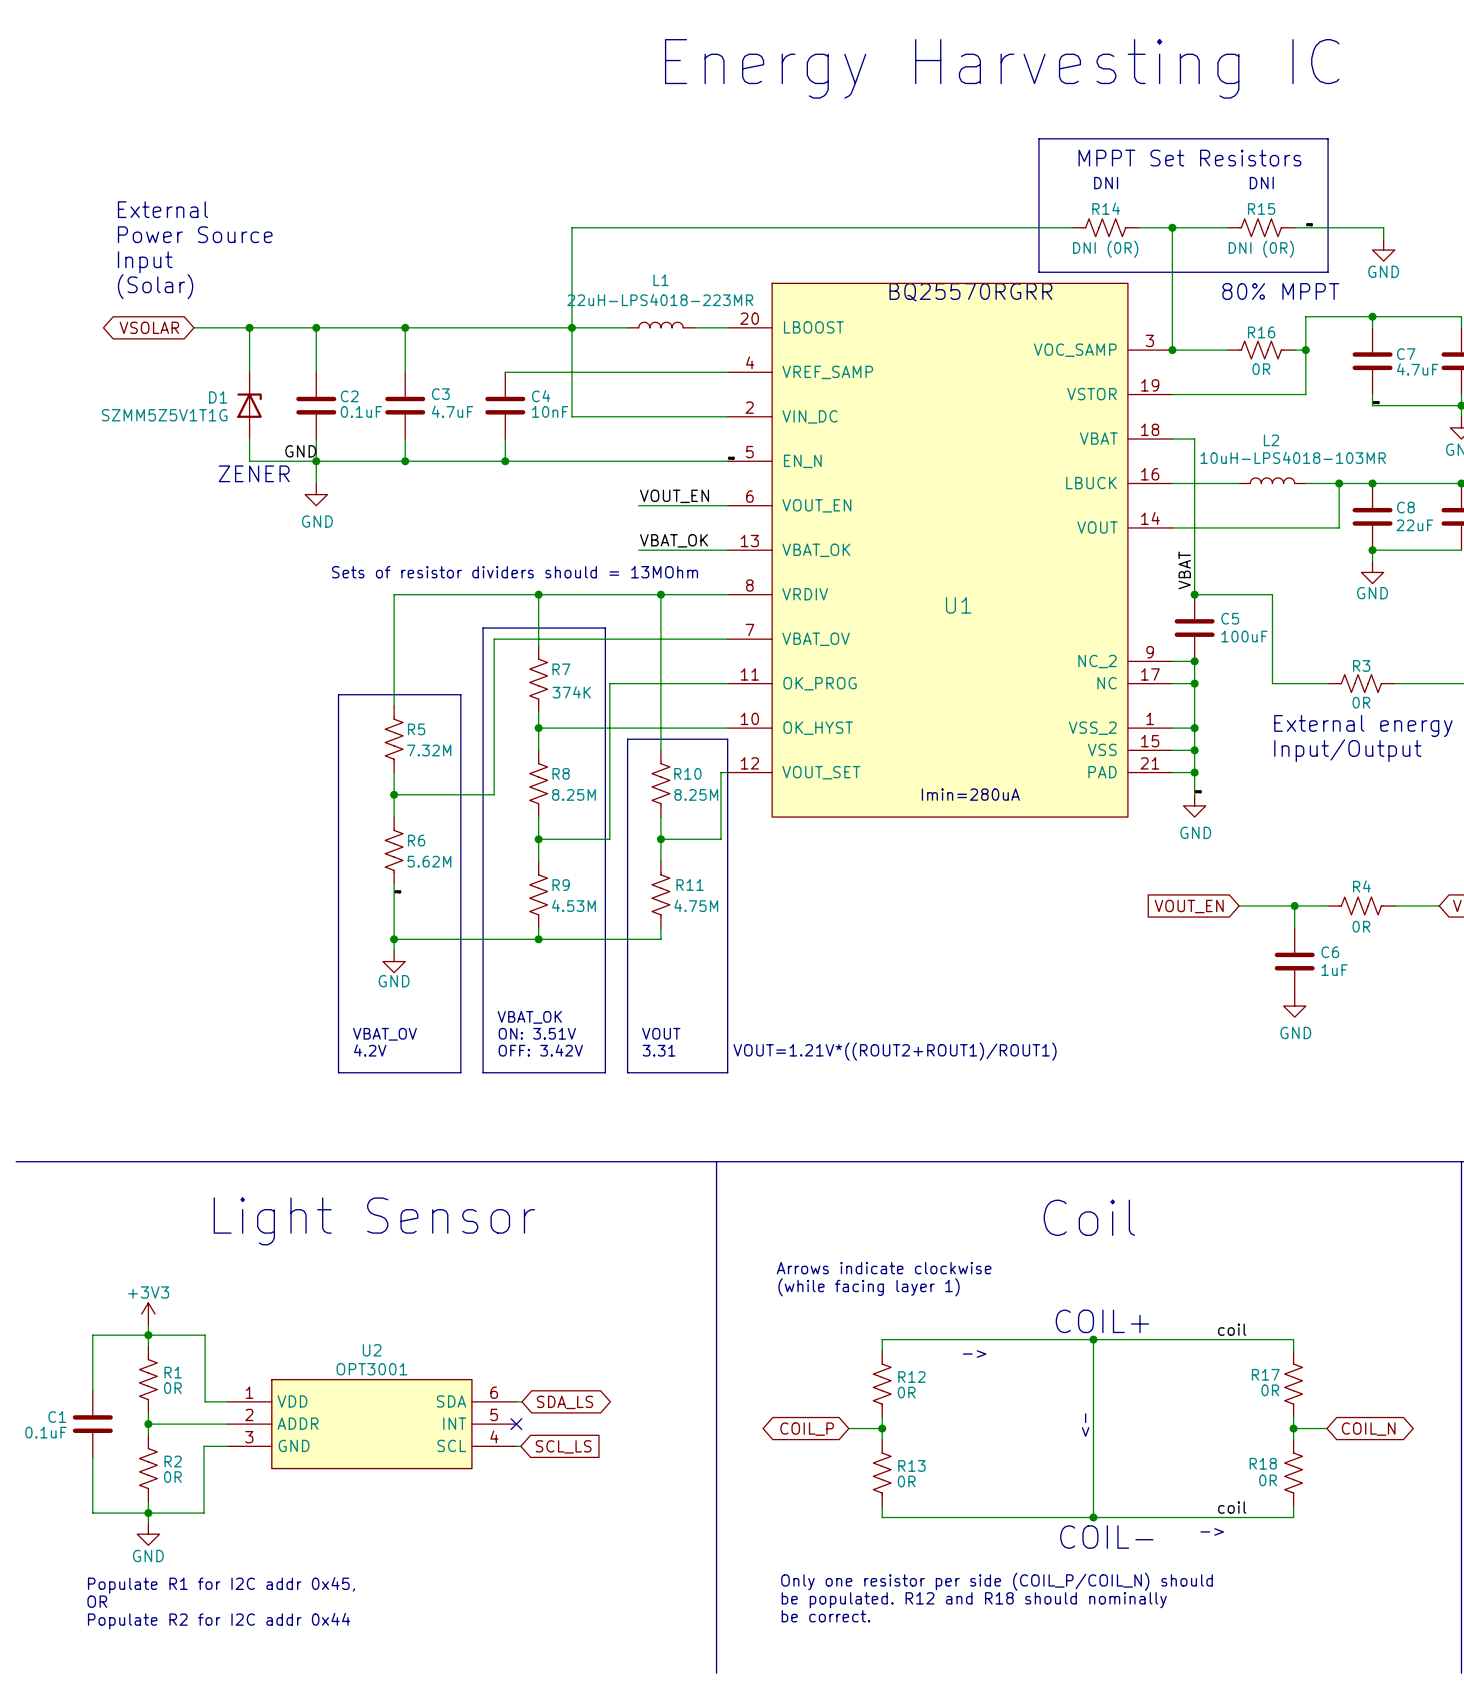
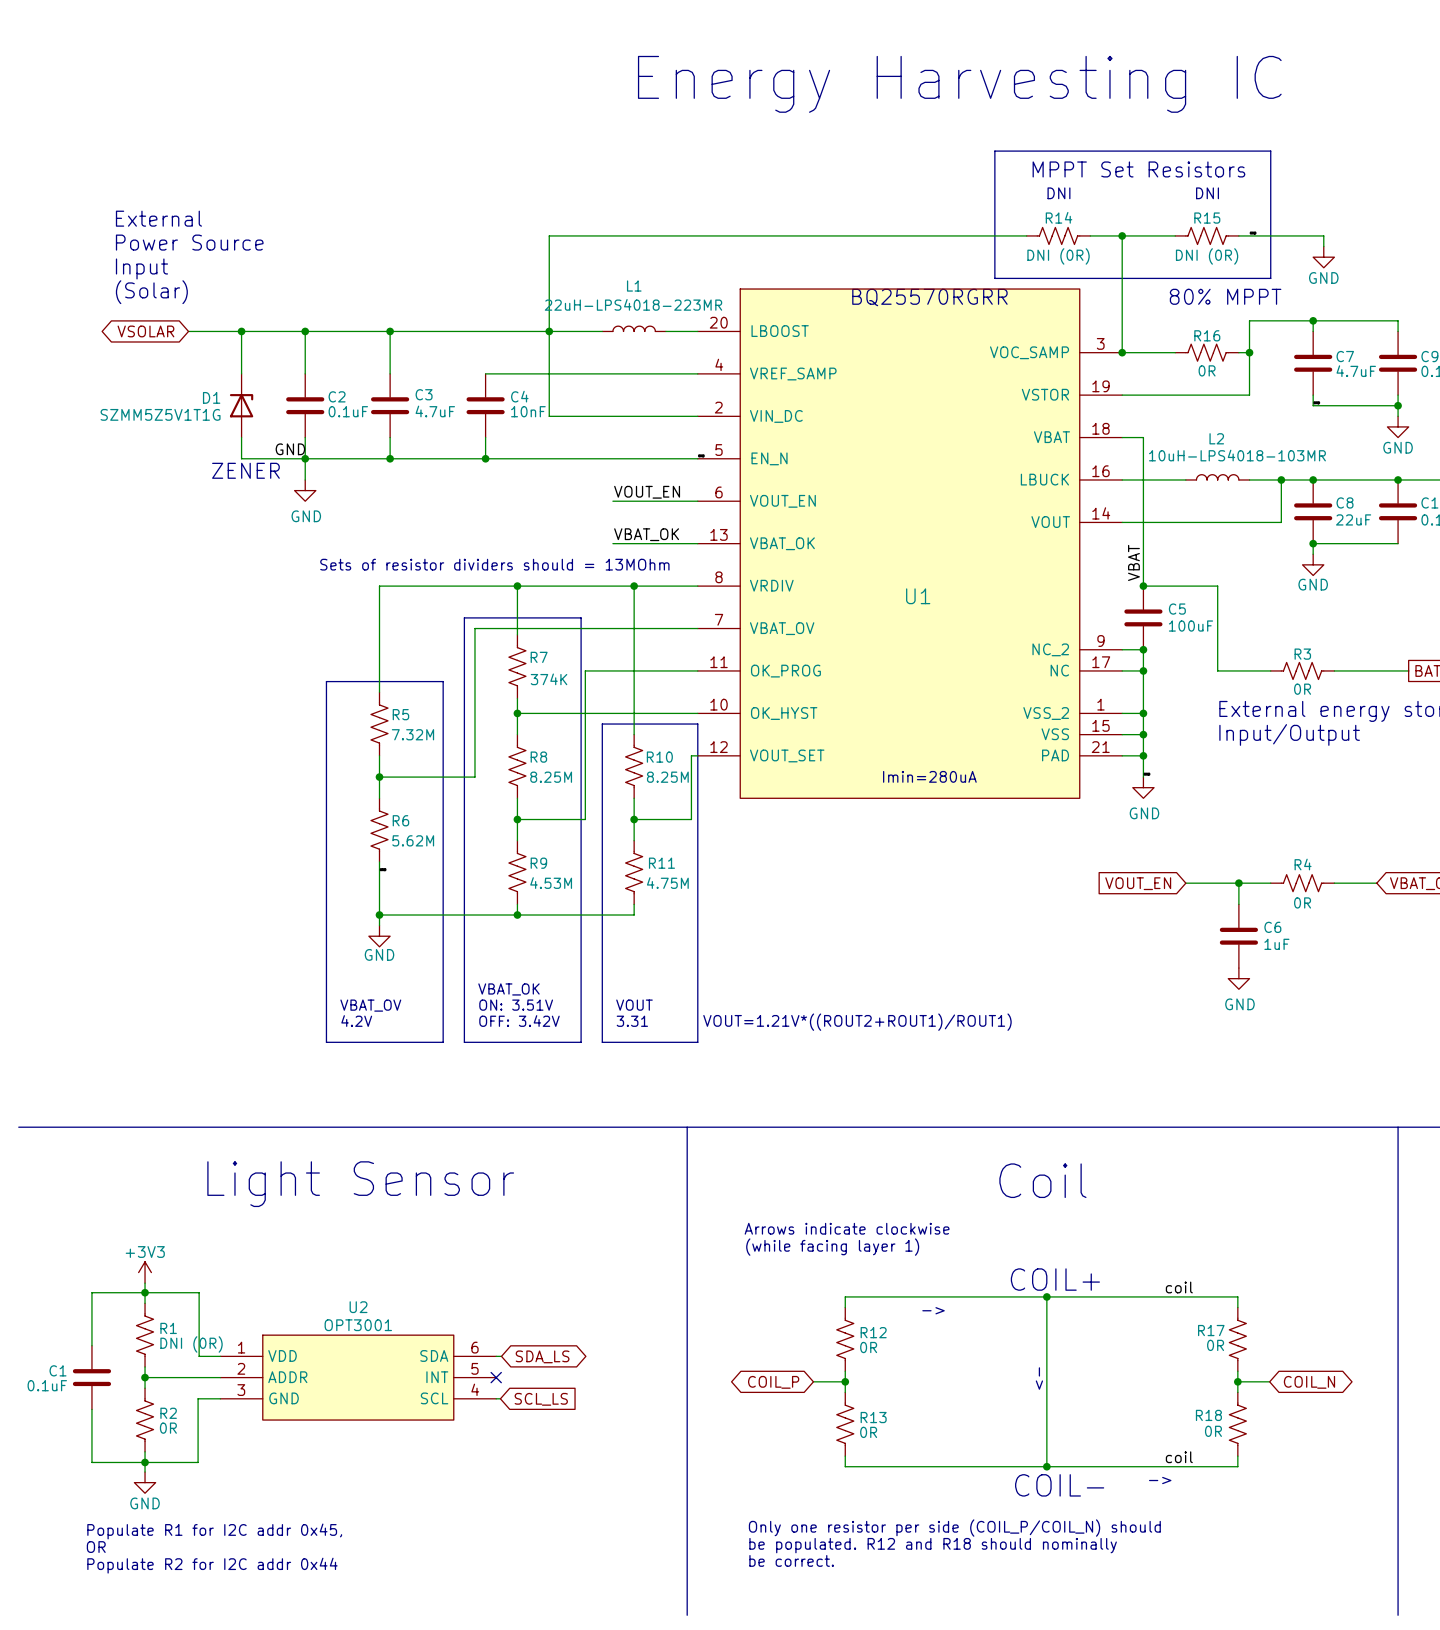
R1 value: 0R (172, 1388) -> DNI (0R) (191, 1344)

